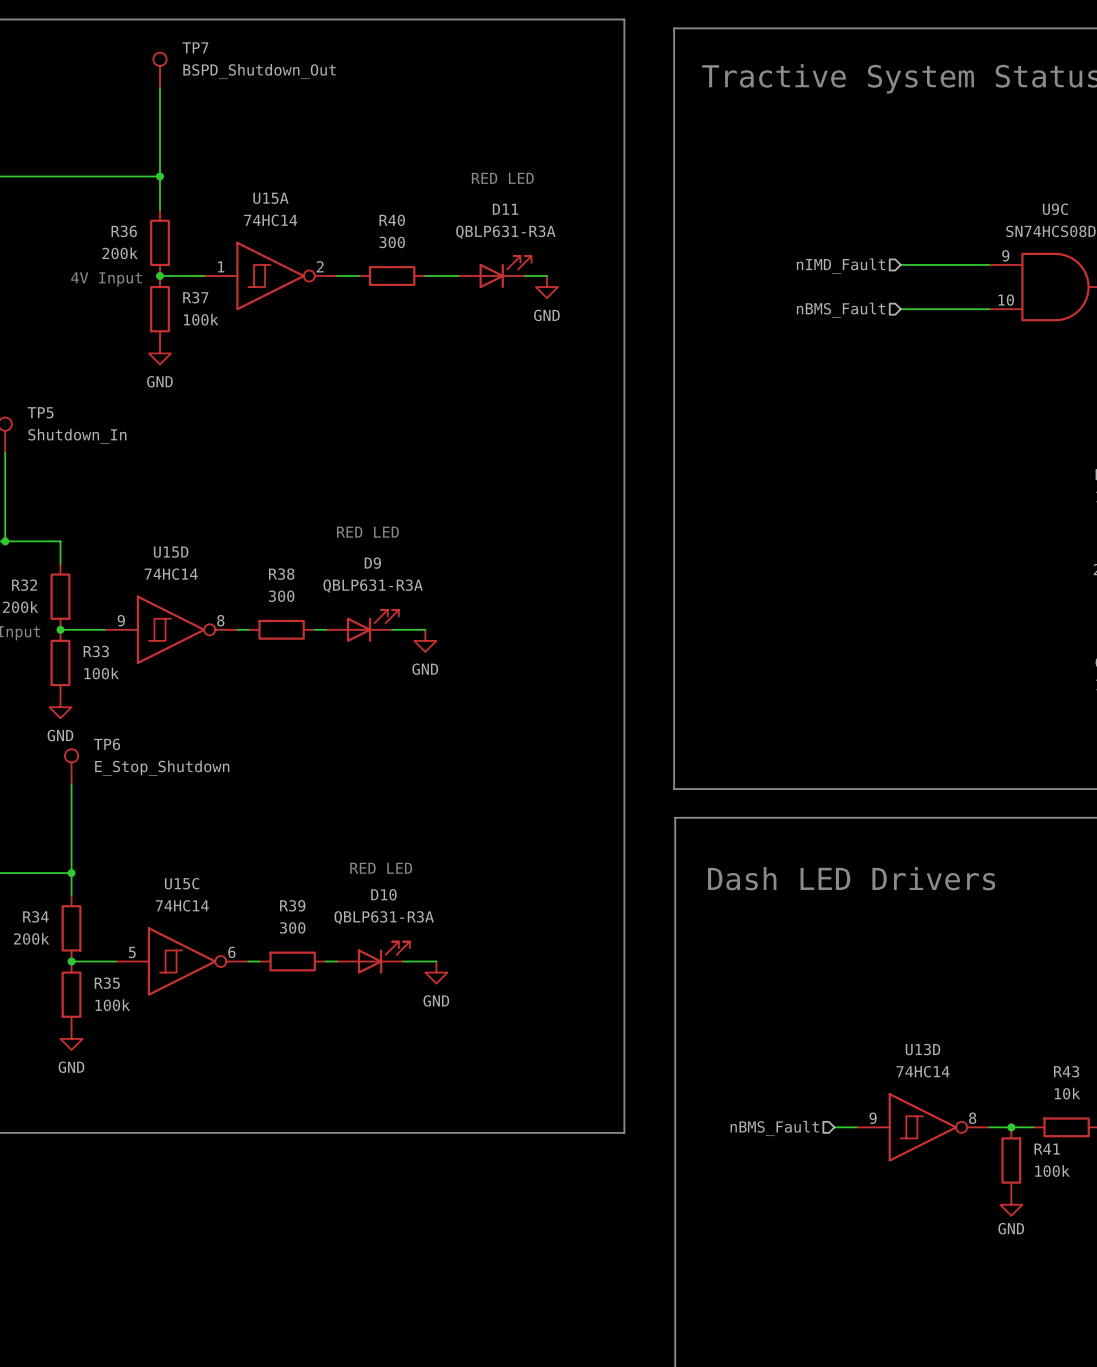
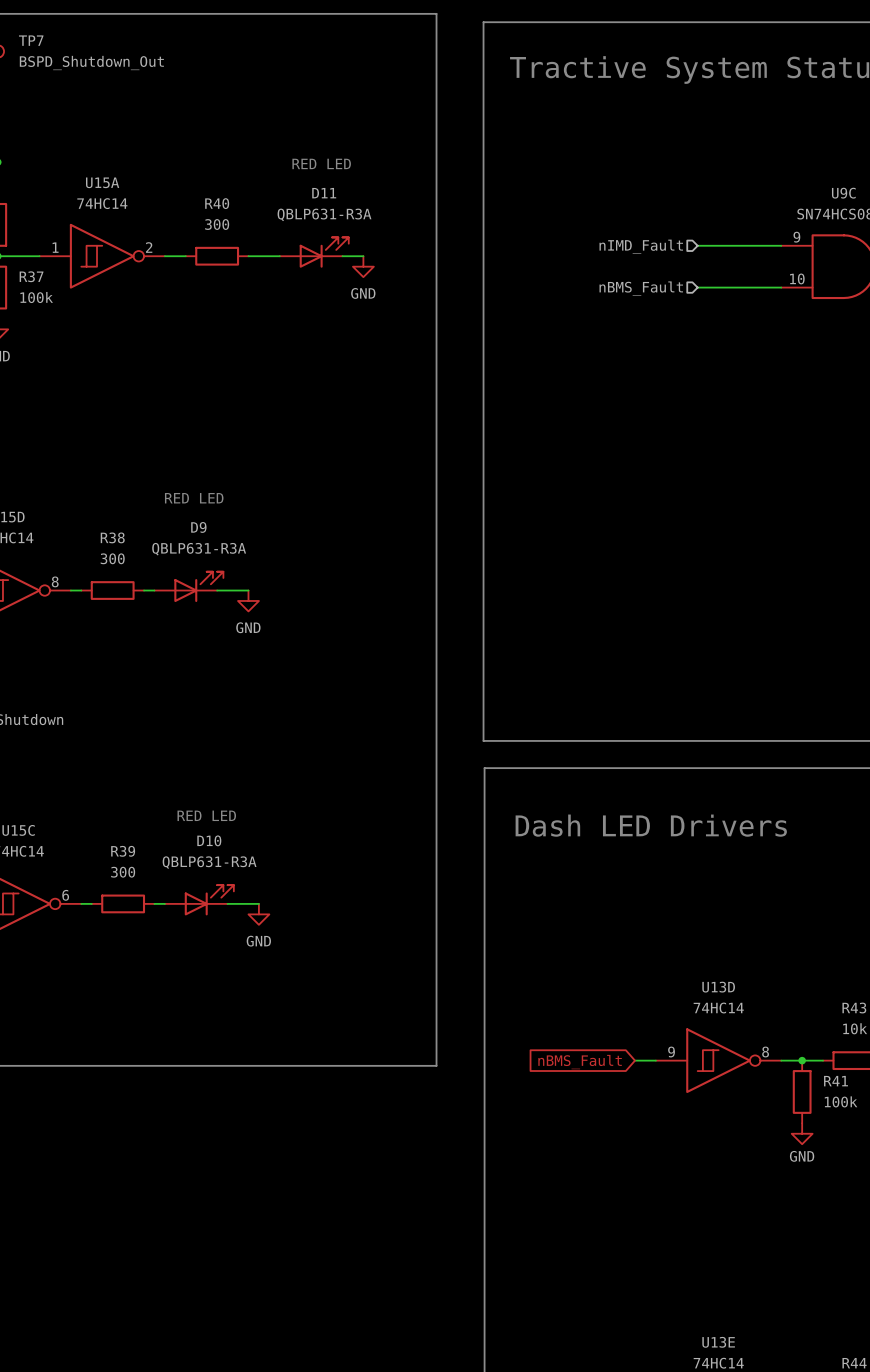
hierarchical label: nBMS_Fault (774, 1128) -> none
global label: none -> nBMS_Fault (580, 1062)

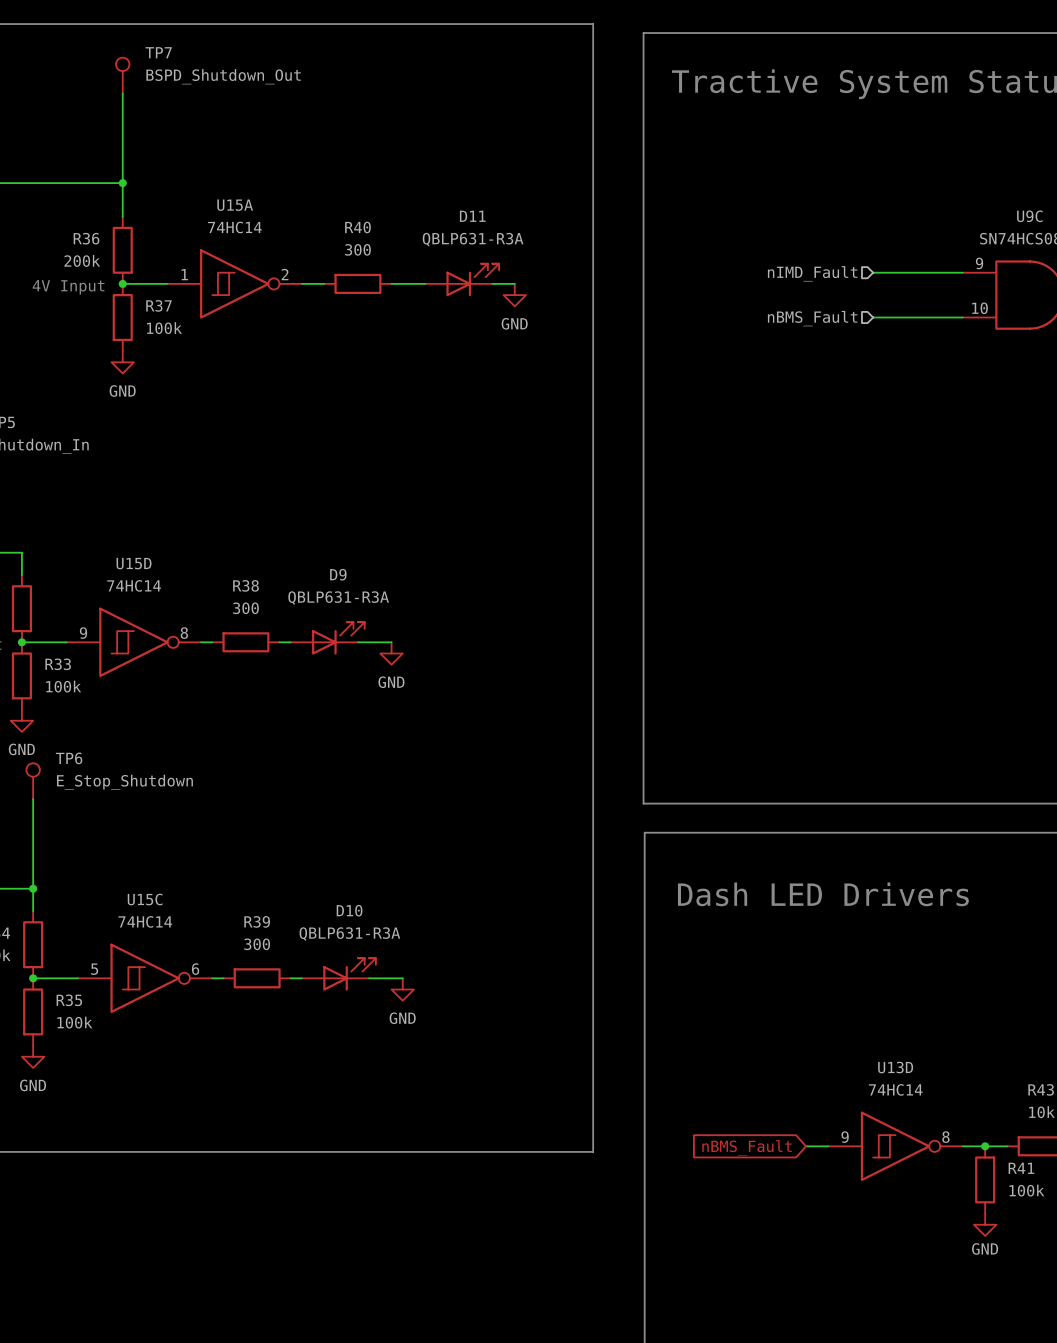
text: RED LED (321, 163) -> none
text: RED LED (194, 498) -> none
text: RED LED (206, 815) -> none

